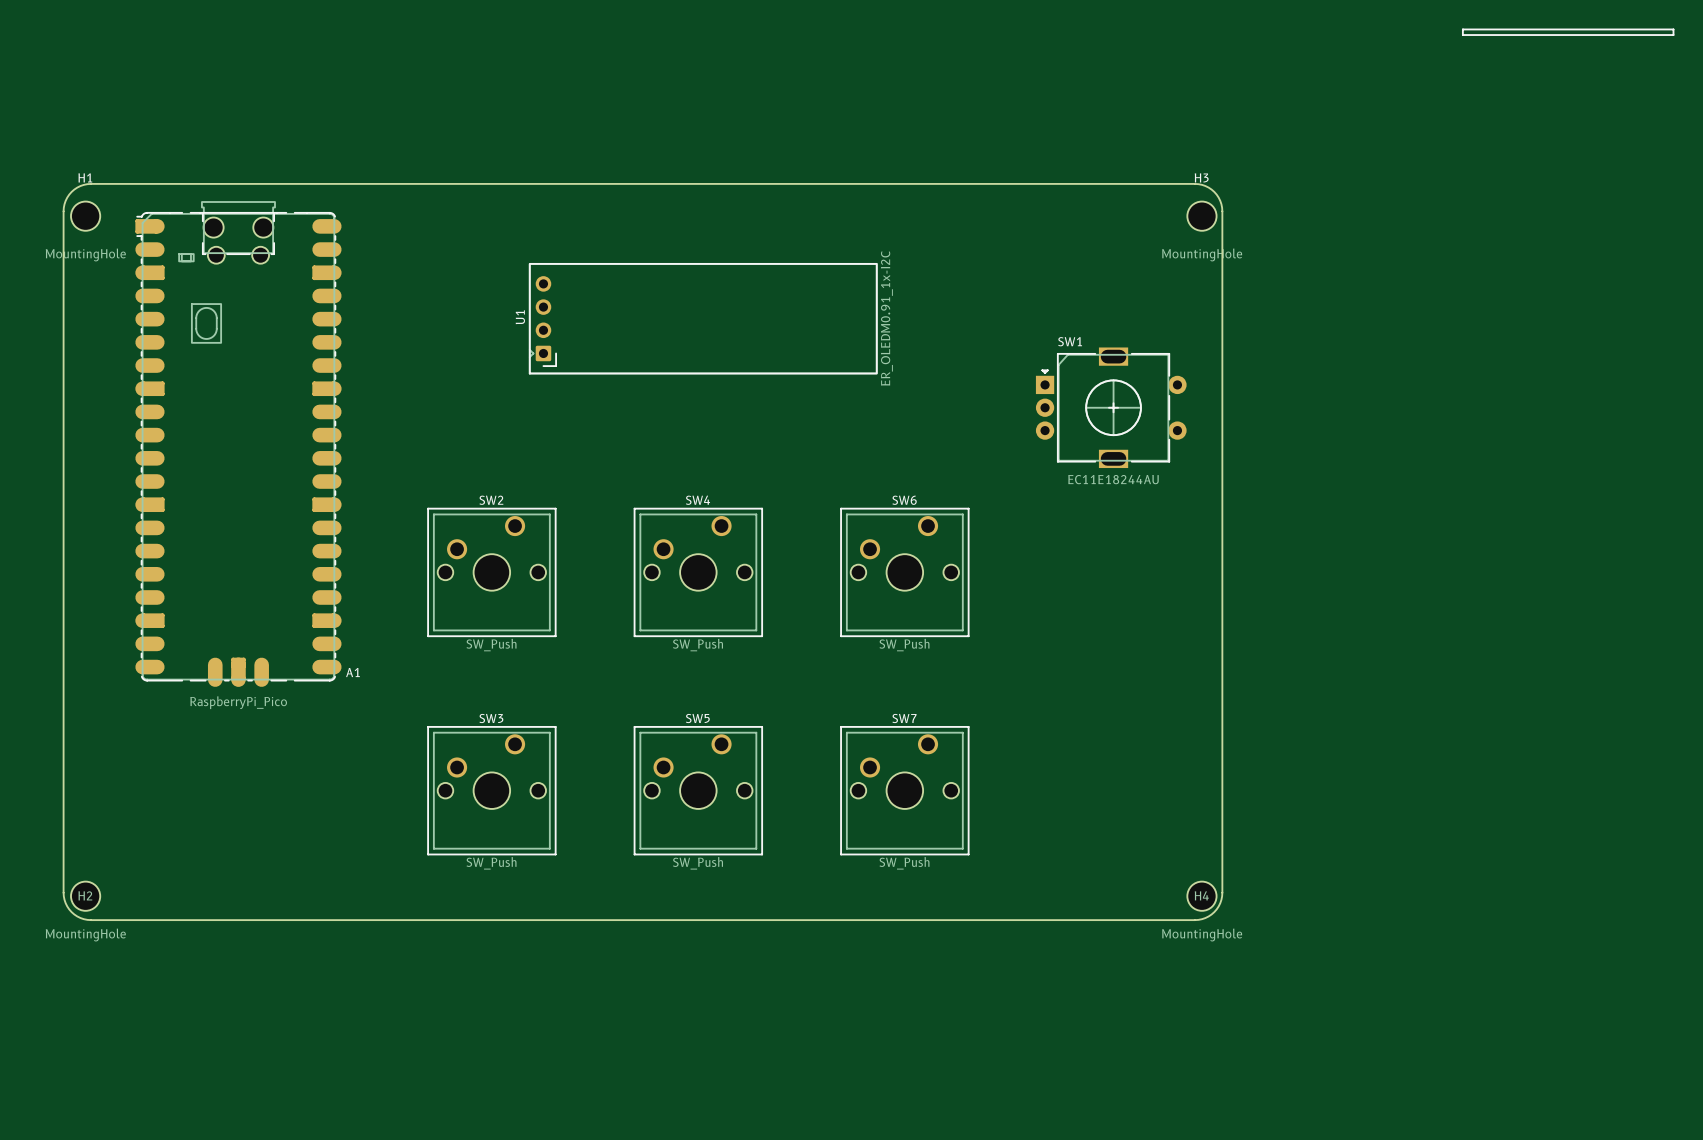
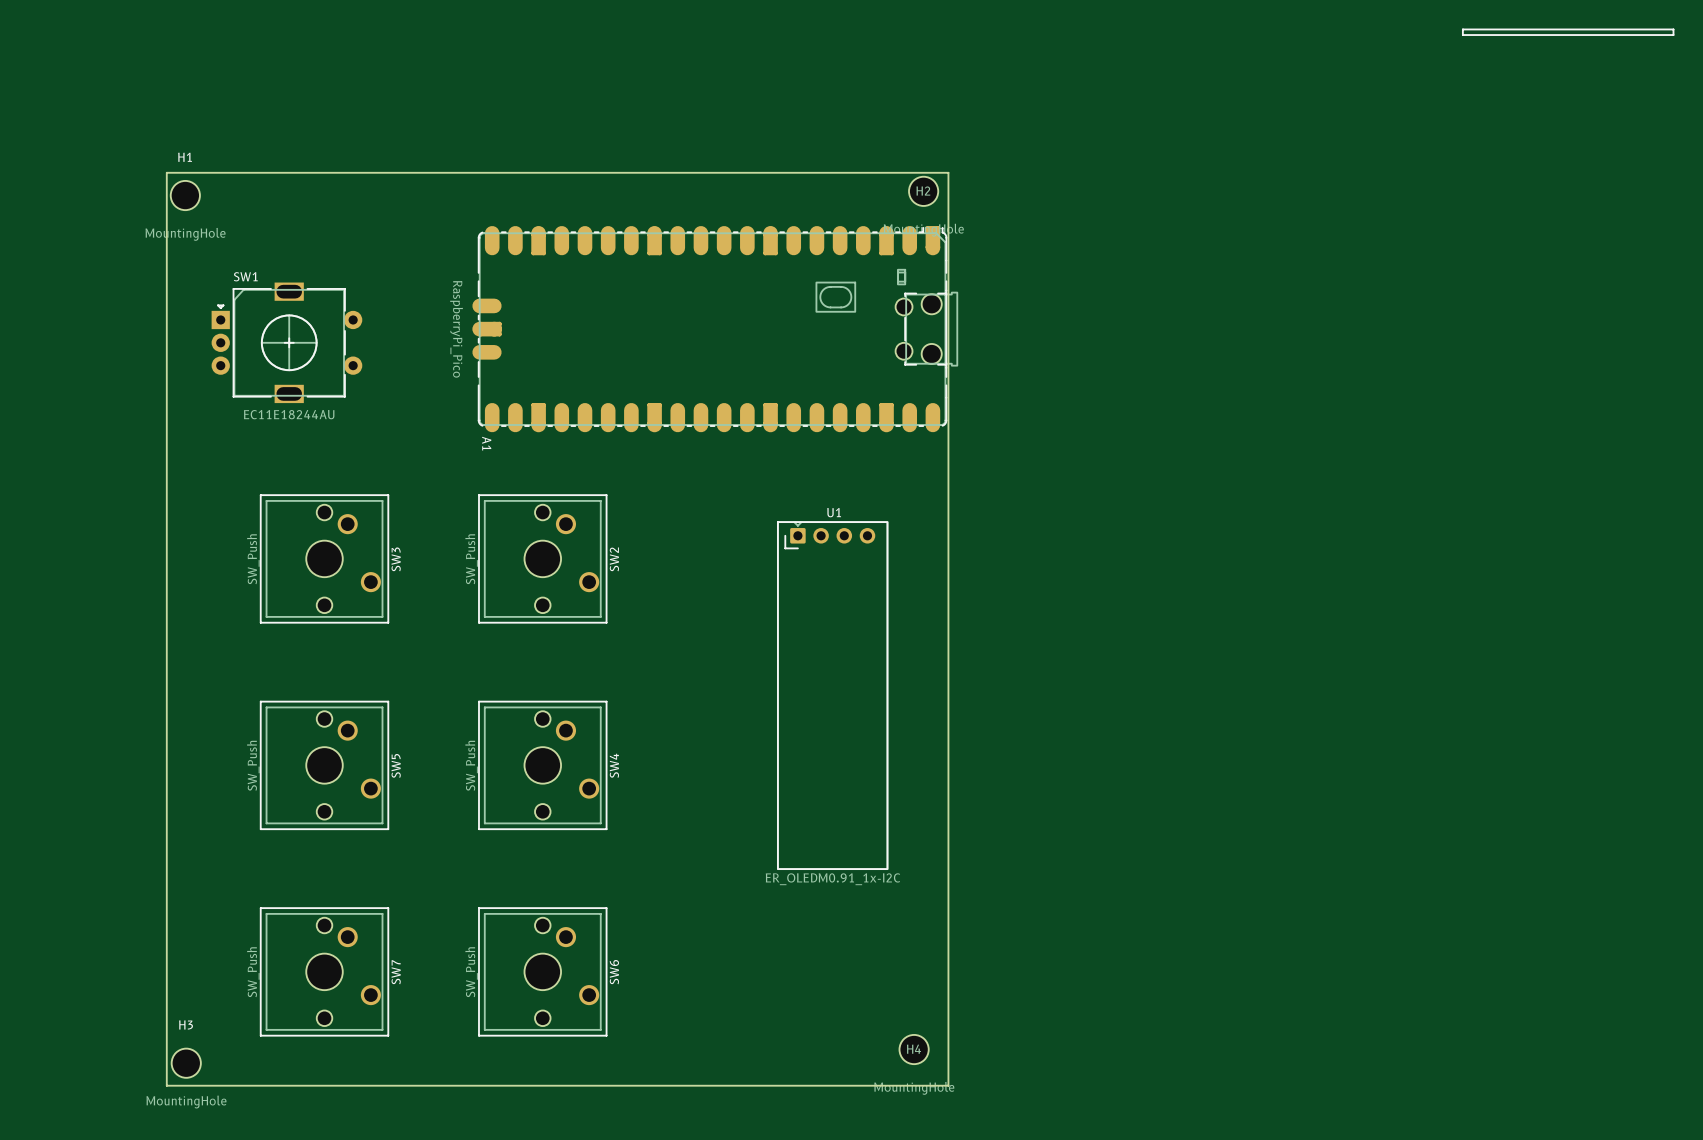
board edge: (90, 183) (1194, 183) (1208, 187) (1218, 197) (1222, 211) (1222, 892) (1218, 906) (1208, 916) (1194, 920) (90, 920) (77, 916) (67, 906) (63, 892) (63, 211) (65, 200) (71, 191) (80, 186) (90, 183) -> (166, 172) (166, 1085) (948, 1085) (948, 172) (166, 172)
H1 position: (85, 216) -> (185, 195)
H3 position: (1201, 216) -> (186, 1063)
U1 rotation: 0° (703, 318) -> 90° clockwise (832, 695)
U1 position: (703, 318) -> (832, 695)
SW1 position: (1111, 407) -> (286, 342)
A1 rotation: 0° (238, 444) -> 90° clockwise (715, 329)
A1 position: (238, 444) -> (715, 329)
SW2 rotation: 0° (491, 572) -> 90° clockwise (542, 558)
SW4 rotation: 0° (698, 572) -> 90° clockwise (542, 765)
SW4 position: (698, 572) -> (542, 765)
SW6 rotation: 0° (904, 572) -> 90° clockwise (542, 971)
SW6 position: (904, 572) -> (542, 971)
SW3 rotation: 0° (491, 790) -> 90° clockwise (324, 558)
SW3 position: (491, 790) -> (324, 558)
SW5 rotation: 0° (698, 790) -> 90° clockwise (324, 765)
SW5 position: (698, 790) -> (324, 765)
SW7 rotation: 0° (904, 790) -> 90° clockwise (324, 971)
SW7 position: (904, 790) -> (324, 971)
H2 position: (85, 896) -> (923, 191)
H4 position: (1201, 896) -> (914, 1049)

